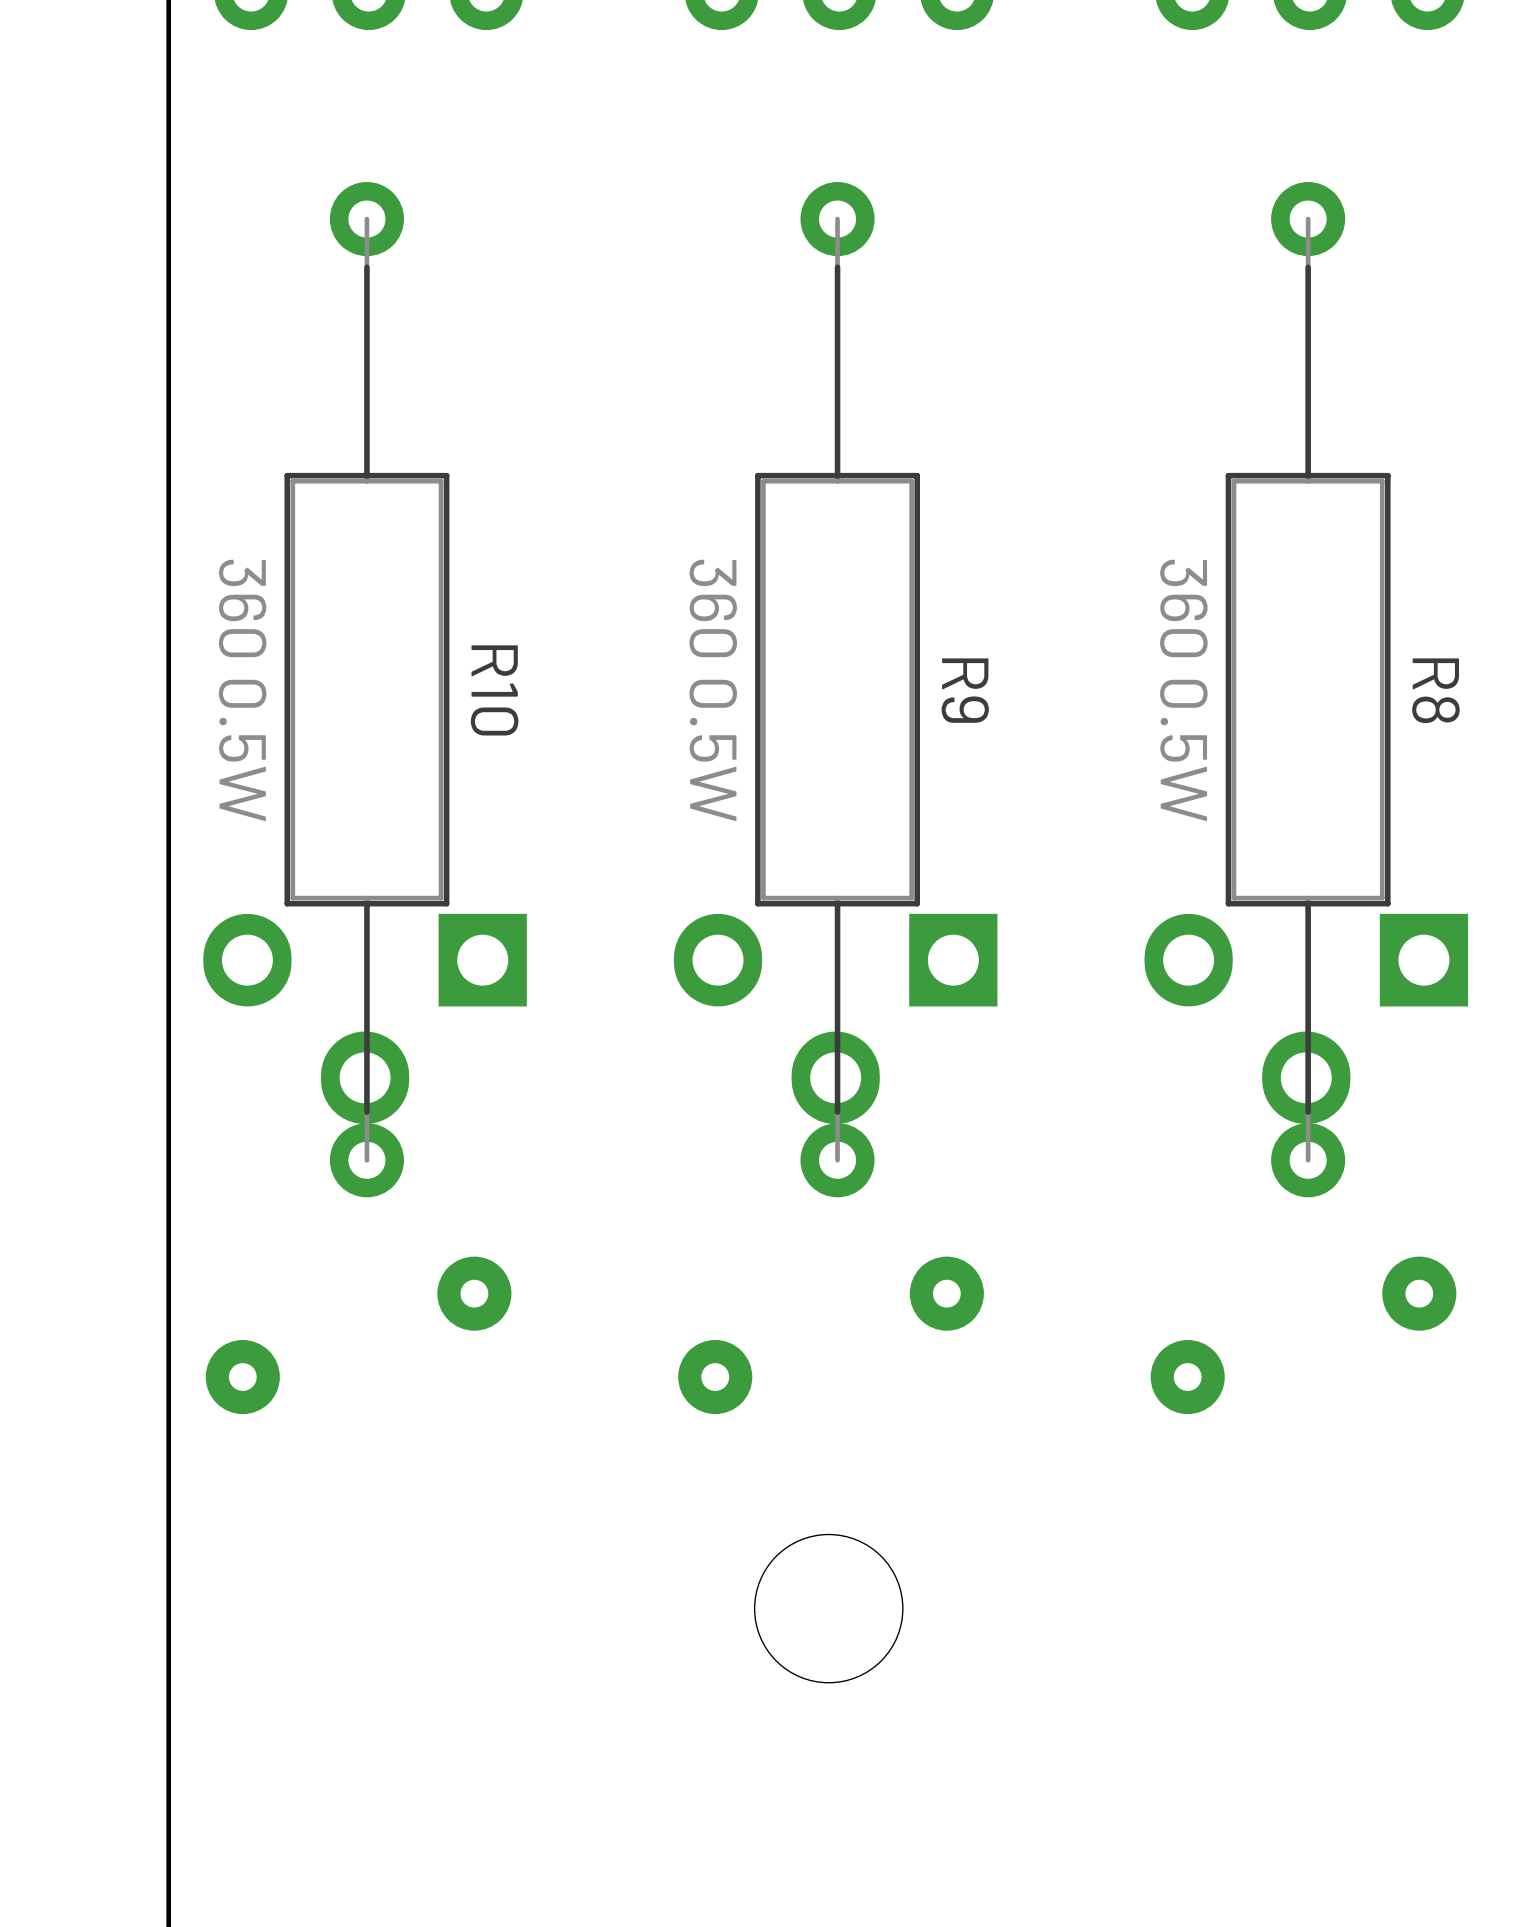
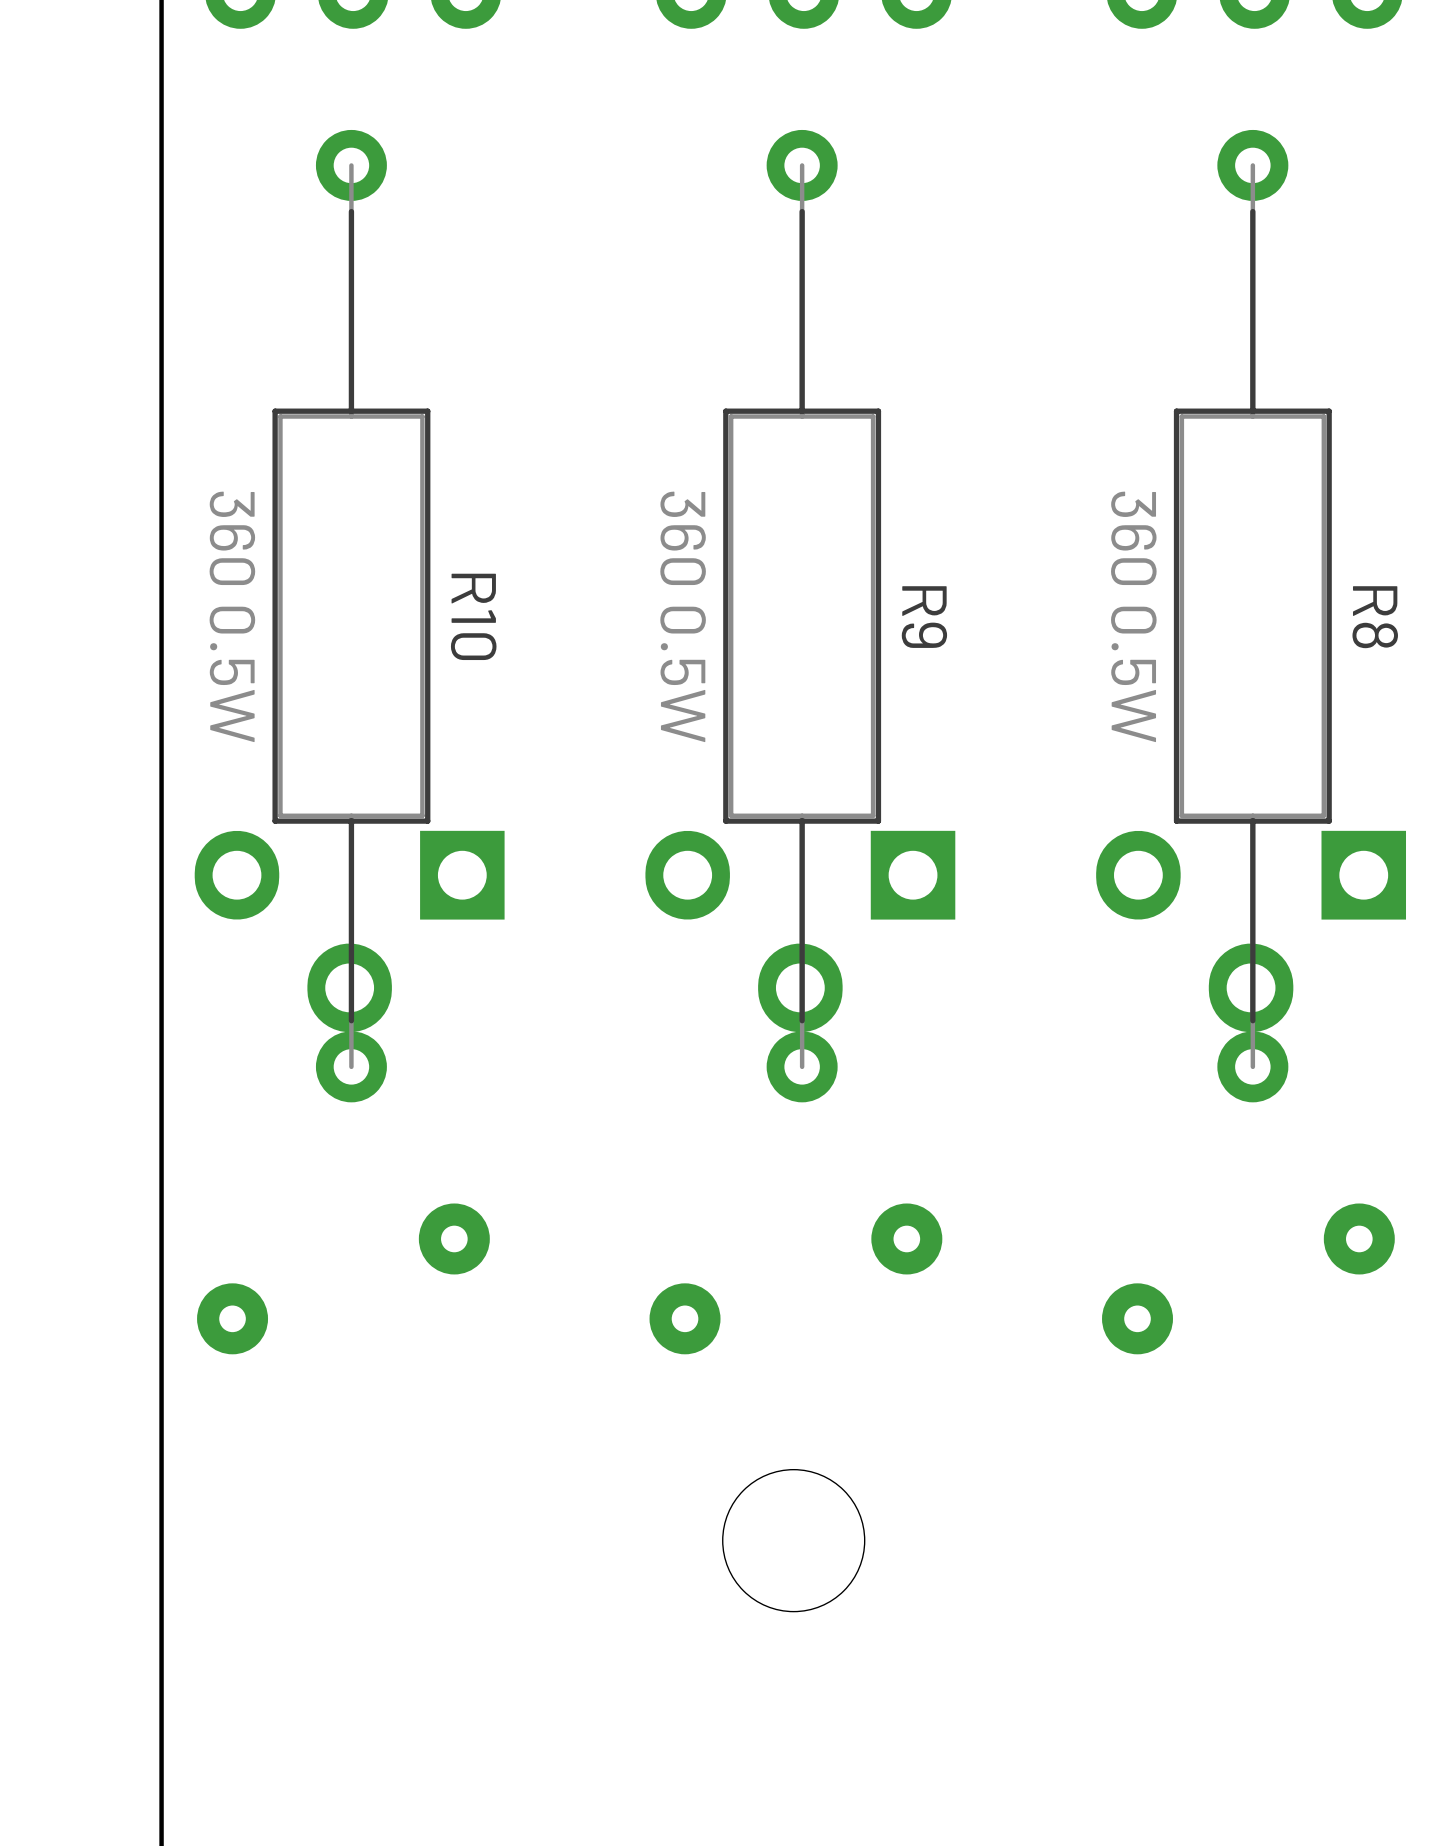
R10 position: (366, 689) -> (351, 616)
R9 position: (837, 689) -> (802, 616)
R8 position: (1308, 689) -> (1252, 616)
part position: (365, 1018) -> (349, 931)
part position: (835, 1018) -> (800, 931)
part position: (1306, 1018) -> (1251, 931)

